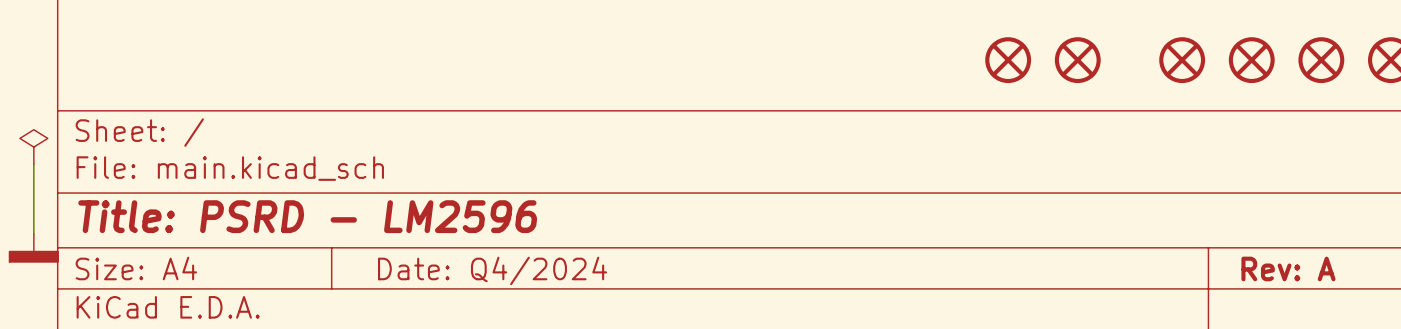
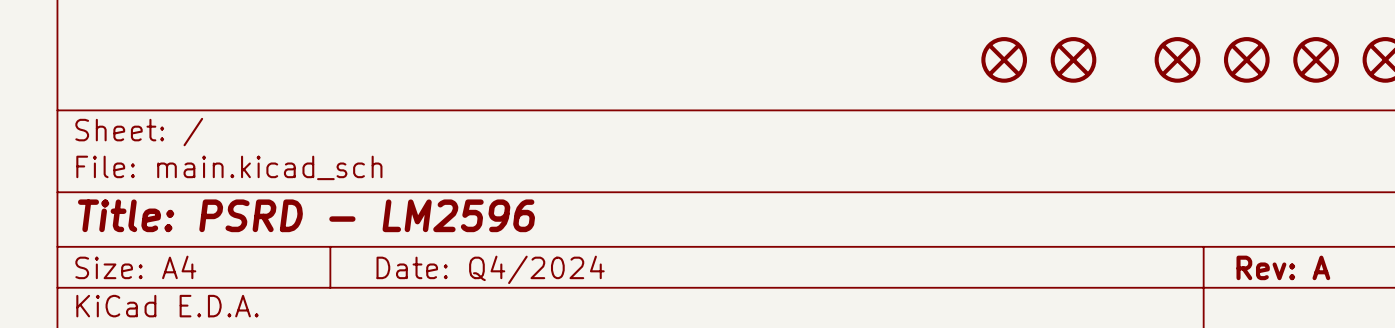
power symbol: (33, 147) -> none
wire: (33, 164) (33, 234) -> none
power symbol: (33, 248) -> none

